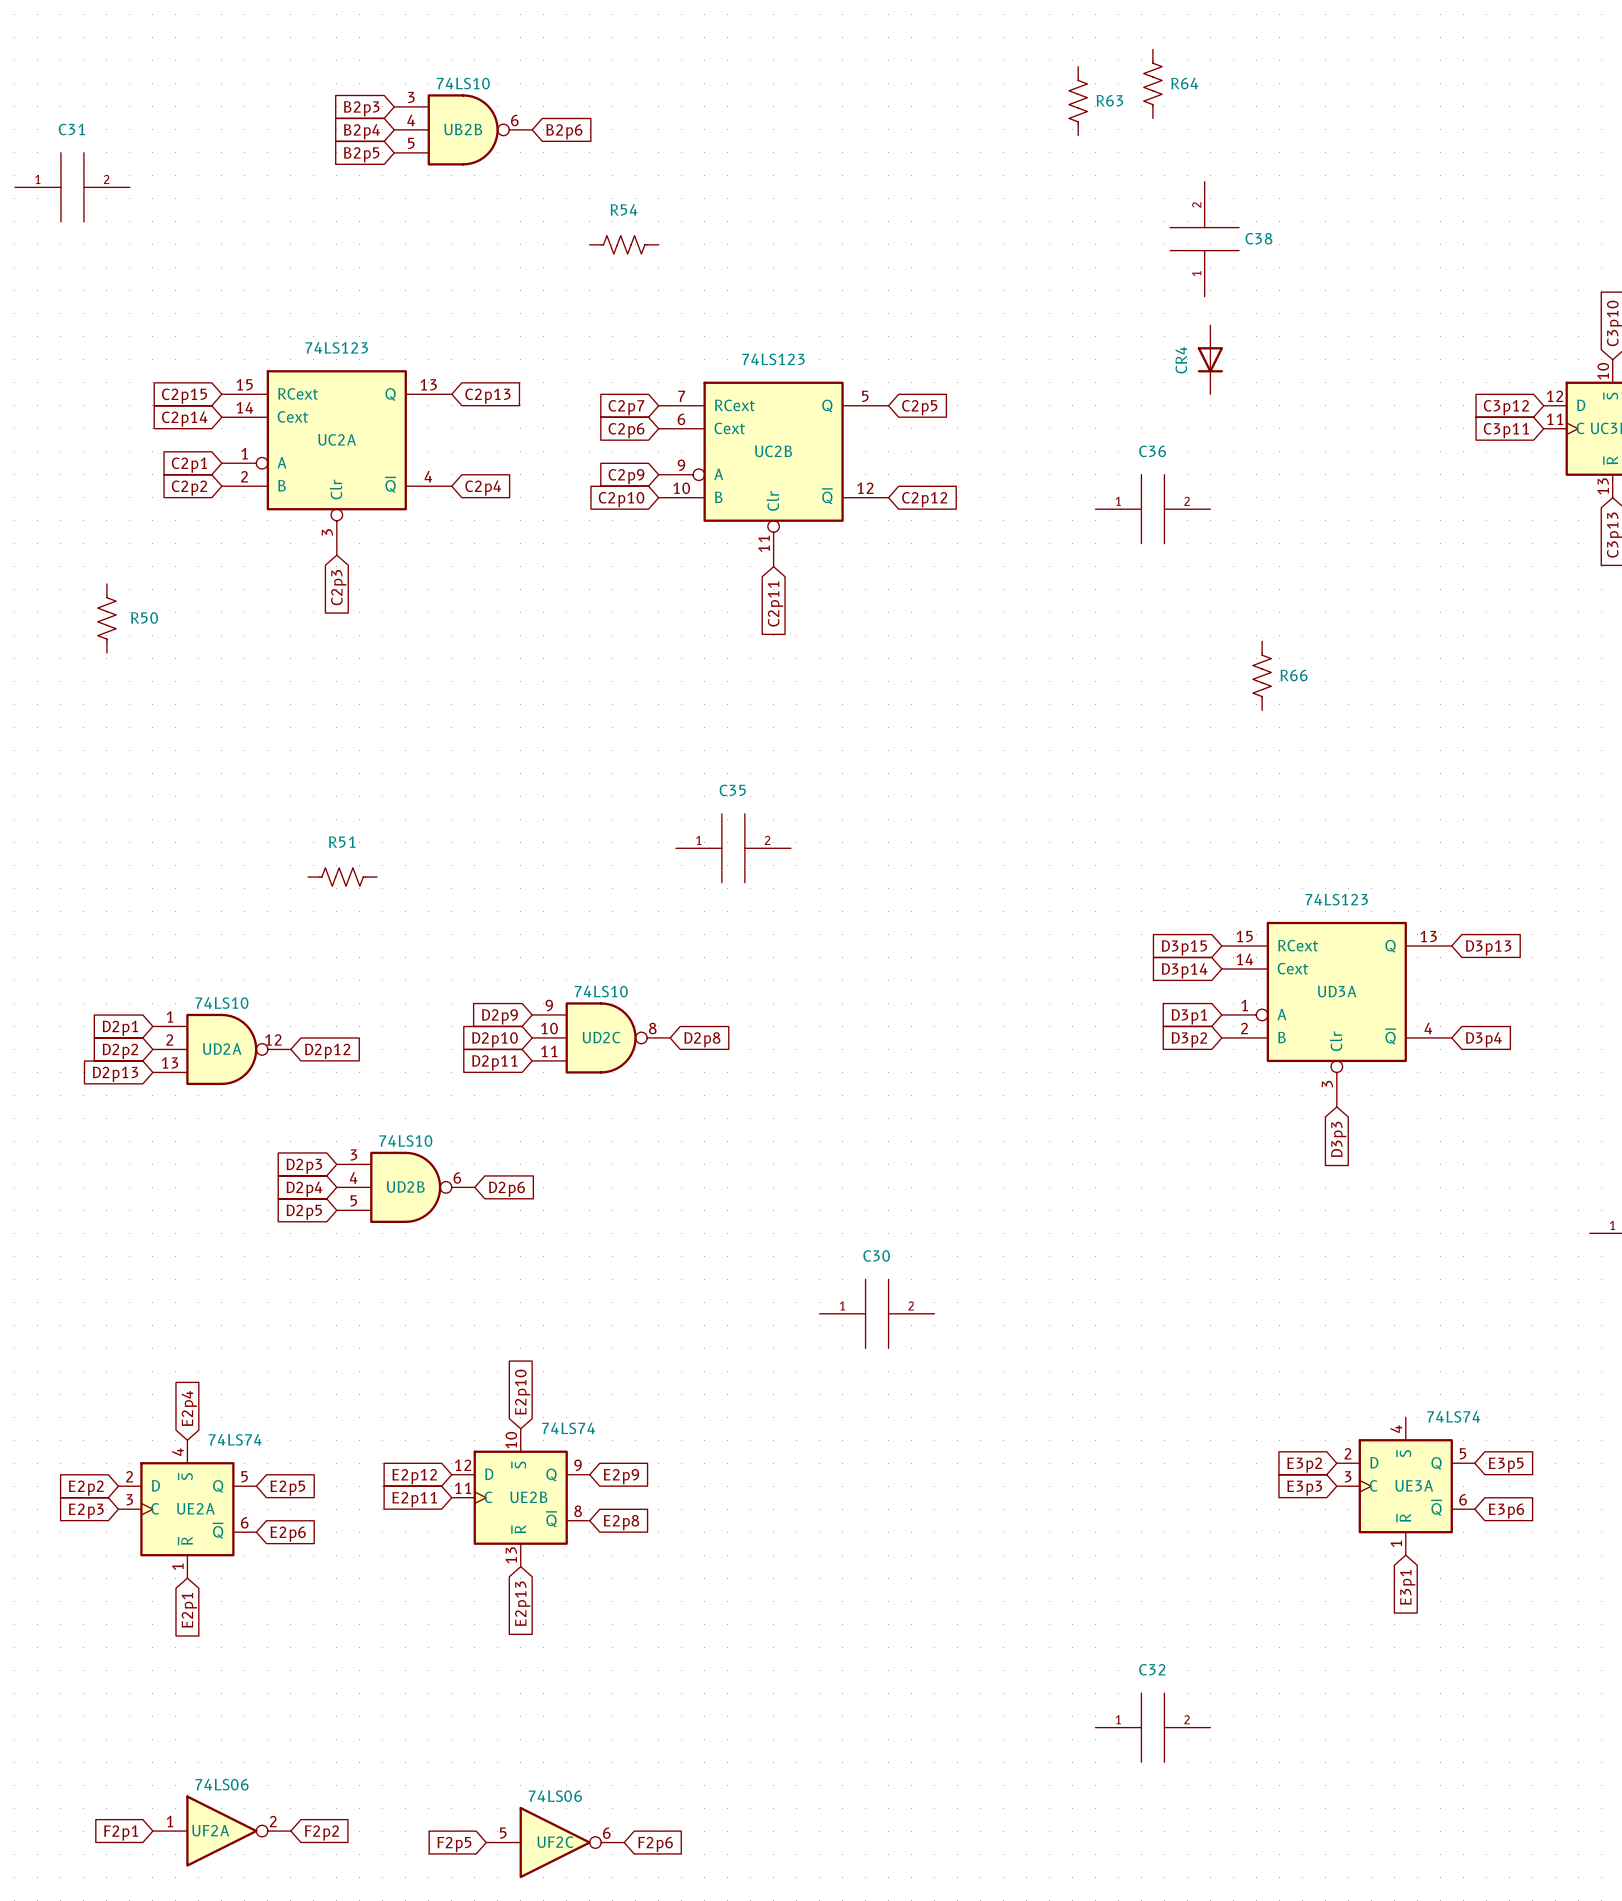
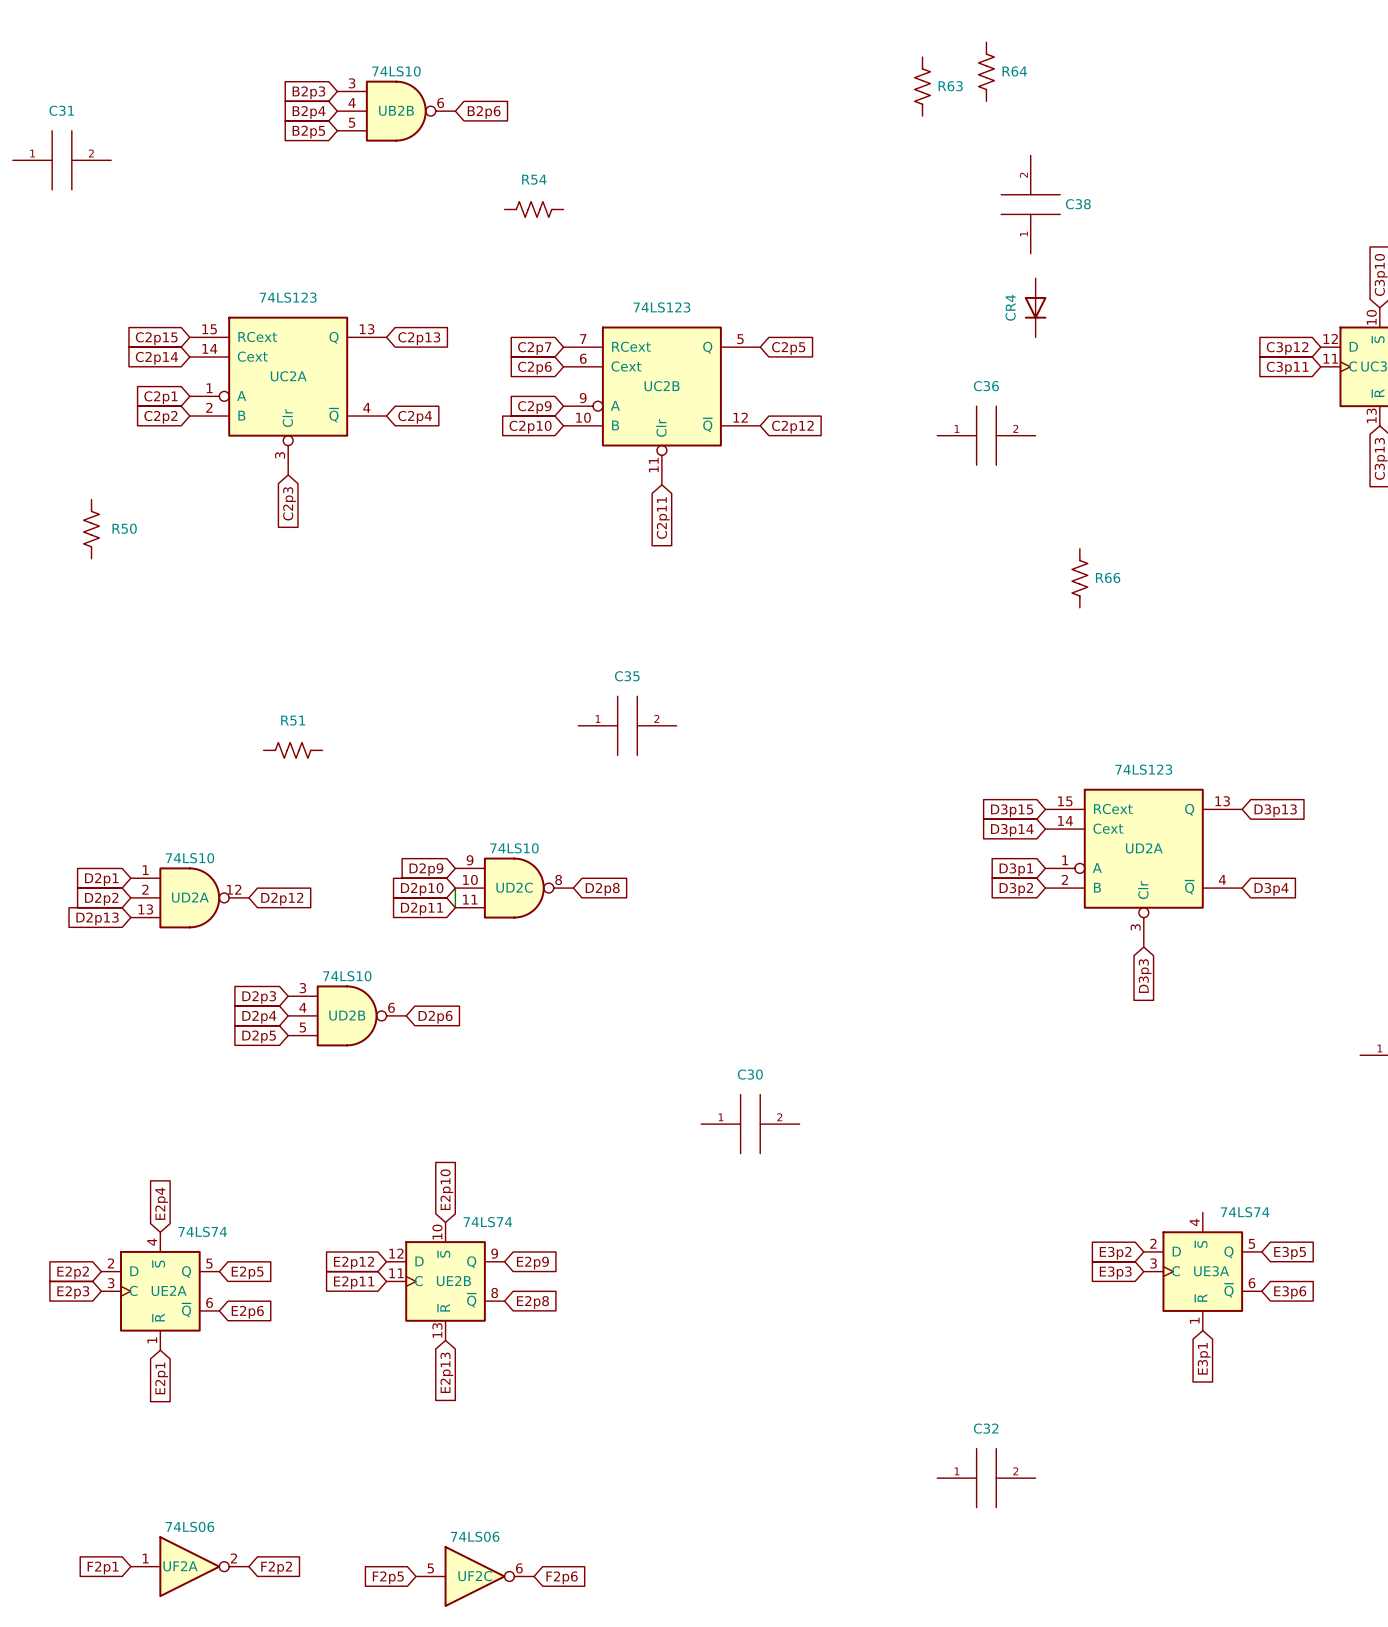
UD3A name: UD3A (1337, 991) -> UD2A (1144, 848)
wire: none -> (455, 888) (455, 907)

